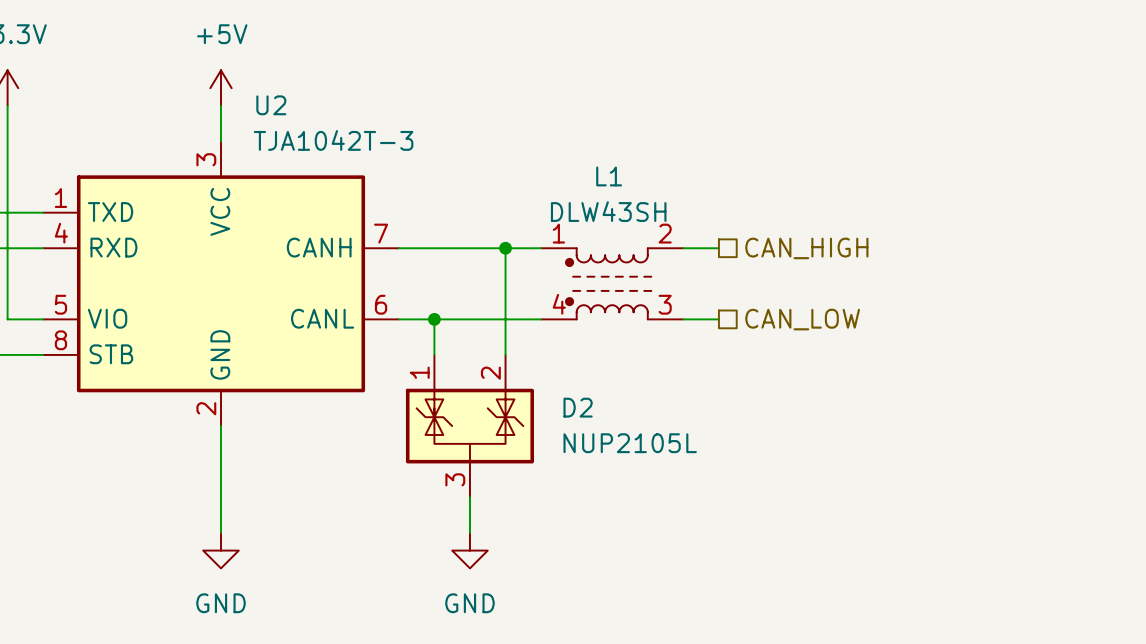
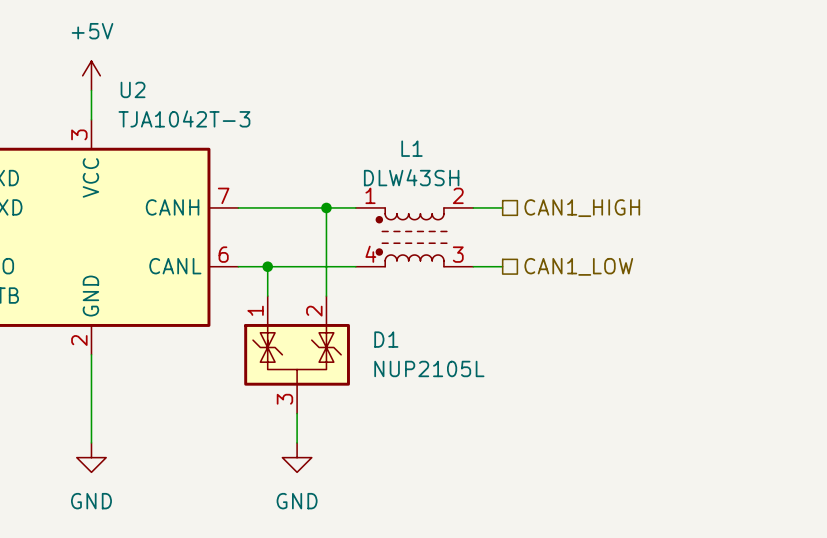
hierarchical label: CAN_HIGH (806, 248) -> CAN1_HIGH (582, 208)
hierarchical label: CAN_LOW (802, 319) -> CAN1_LOW (578, 266)
D2 name: D2 (578, 407) -> D1 (386, 339)

